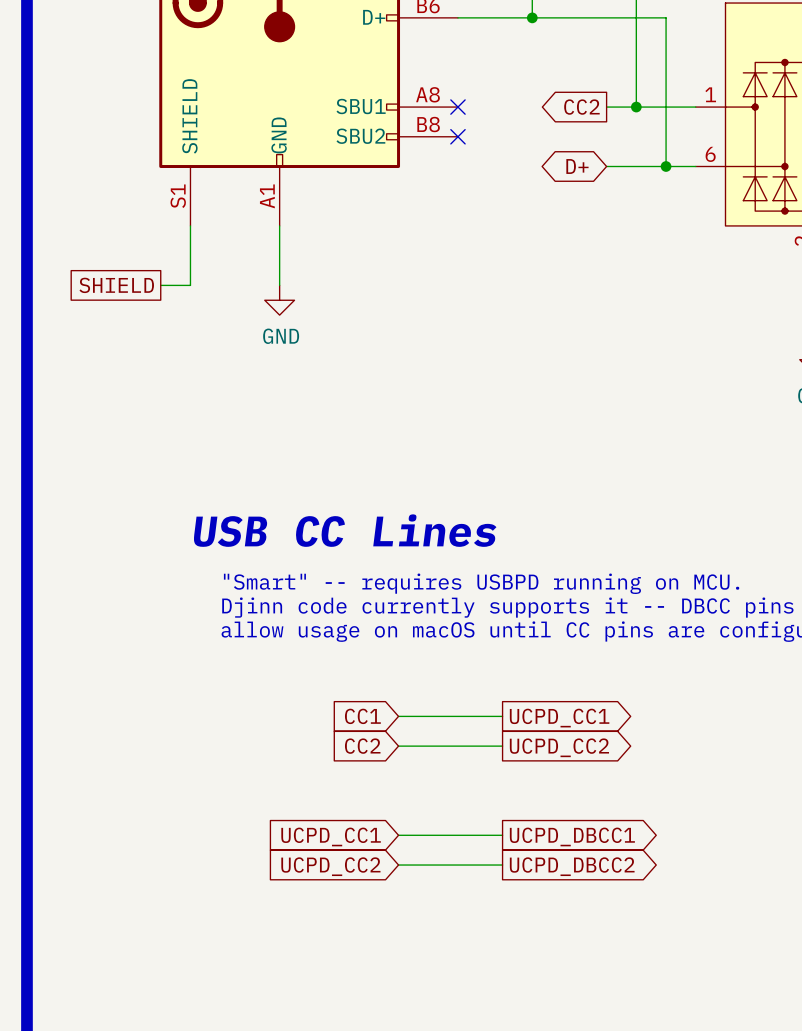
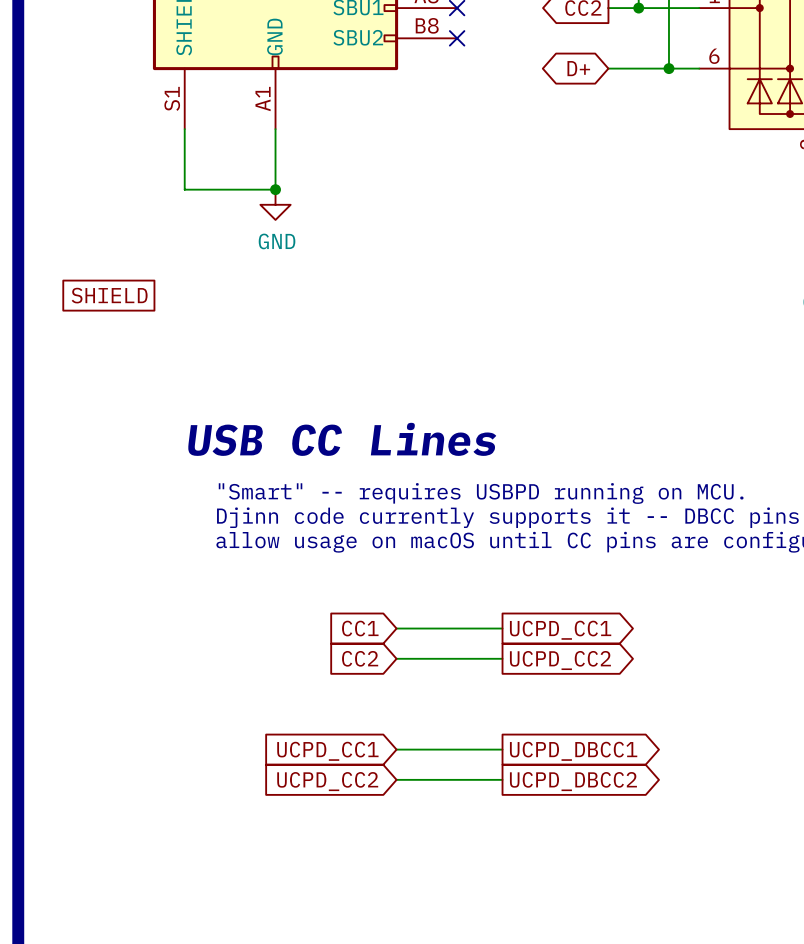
global label position: SHIELD (116, 285) -> SHIELD (109, 295)
wire: (160, 285) (190, 285) -> (275, 189) (184, 189)
junction: none -> (275, 189)

